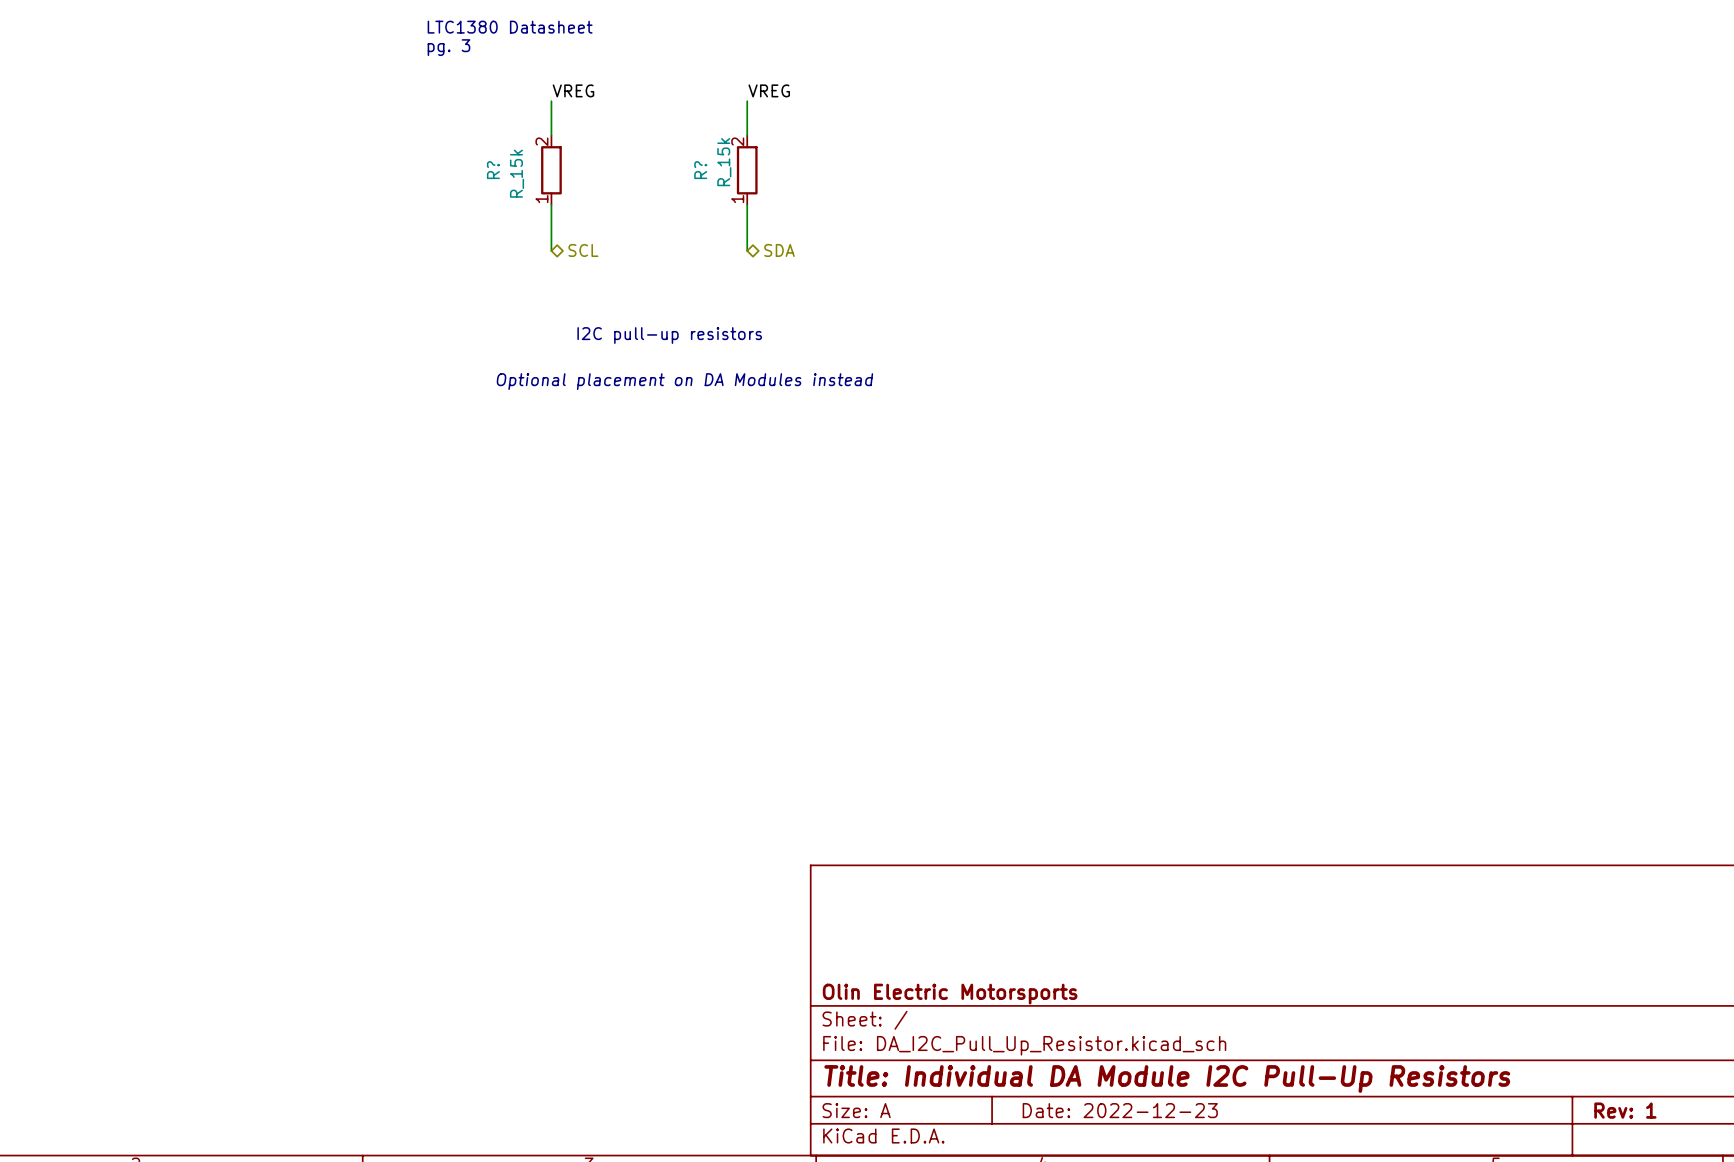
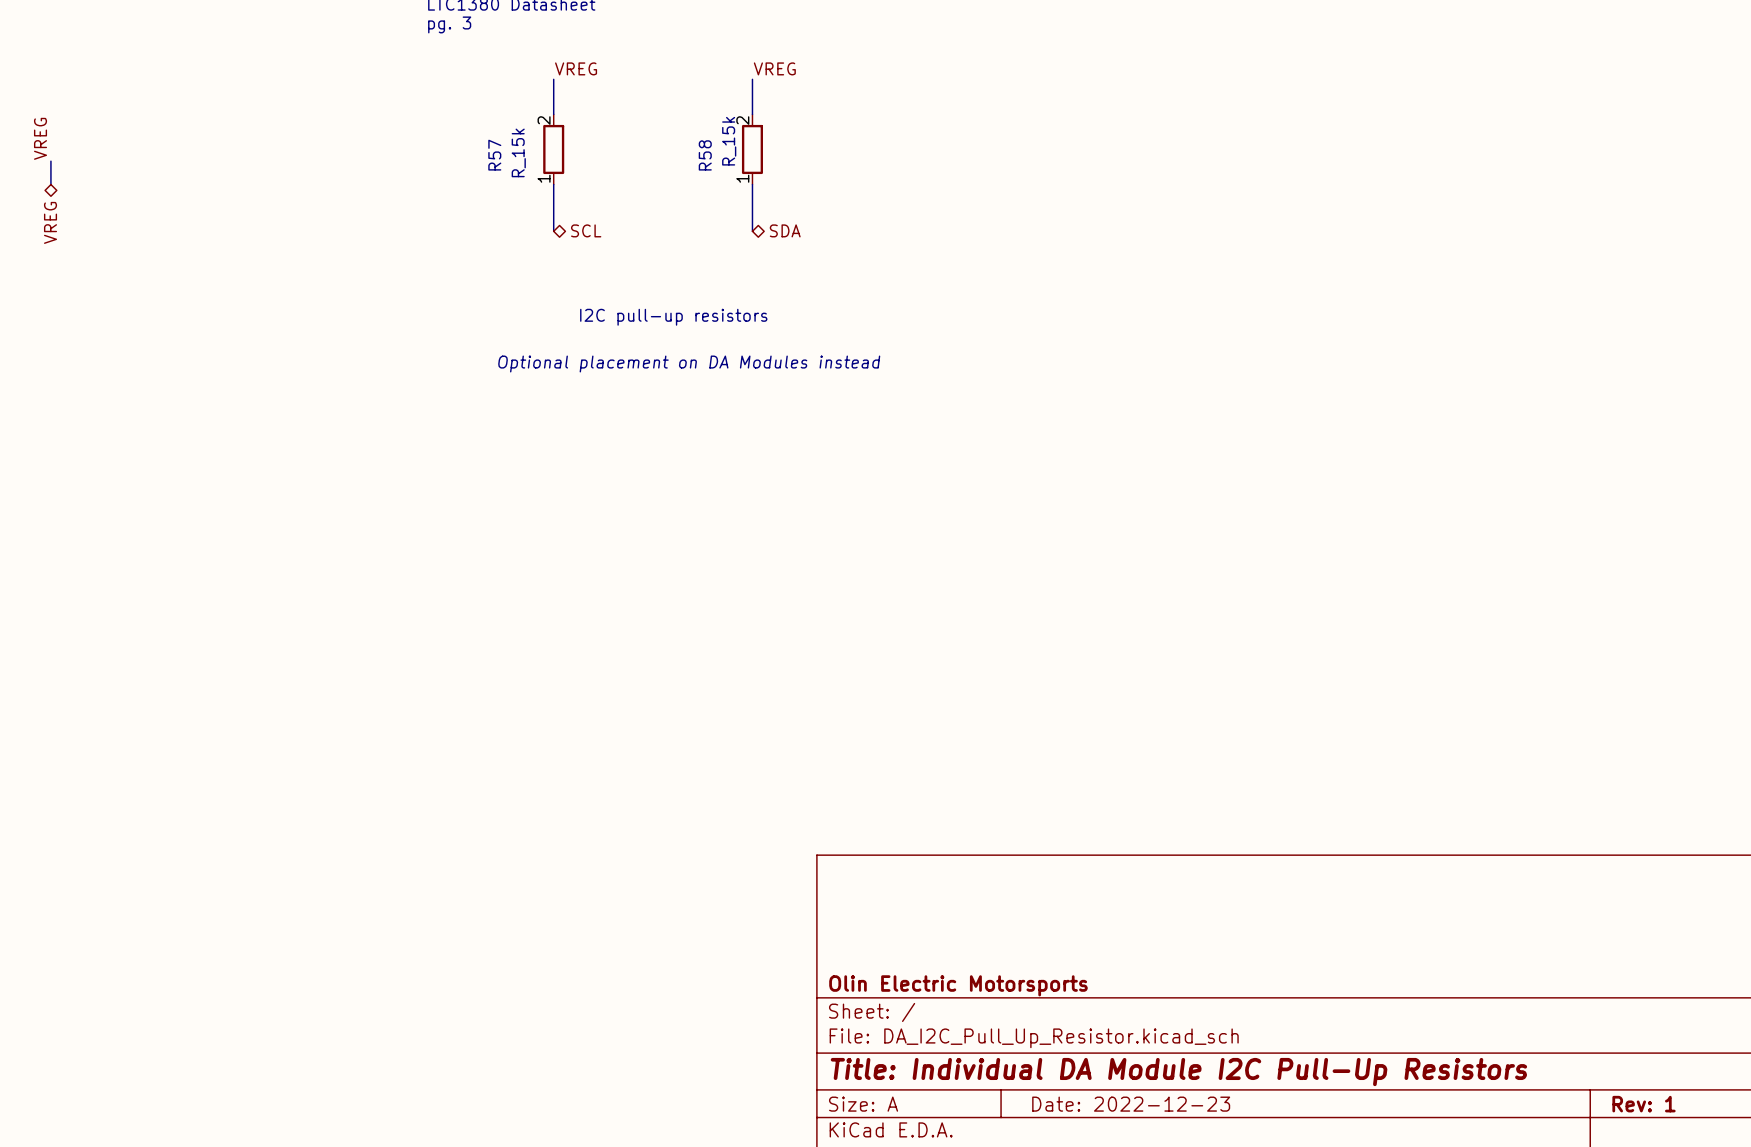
label: none -> VREG (40, 138)
R? name: R? (493, 170) -> R57 (494, 155)
R? name: R? (700, 170) -> R58 (705, 155)
wire: none -> (50, 161) (50, 184)
hierarchical label: none -> VREG (50, 222)

